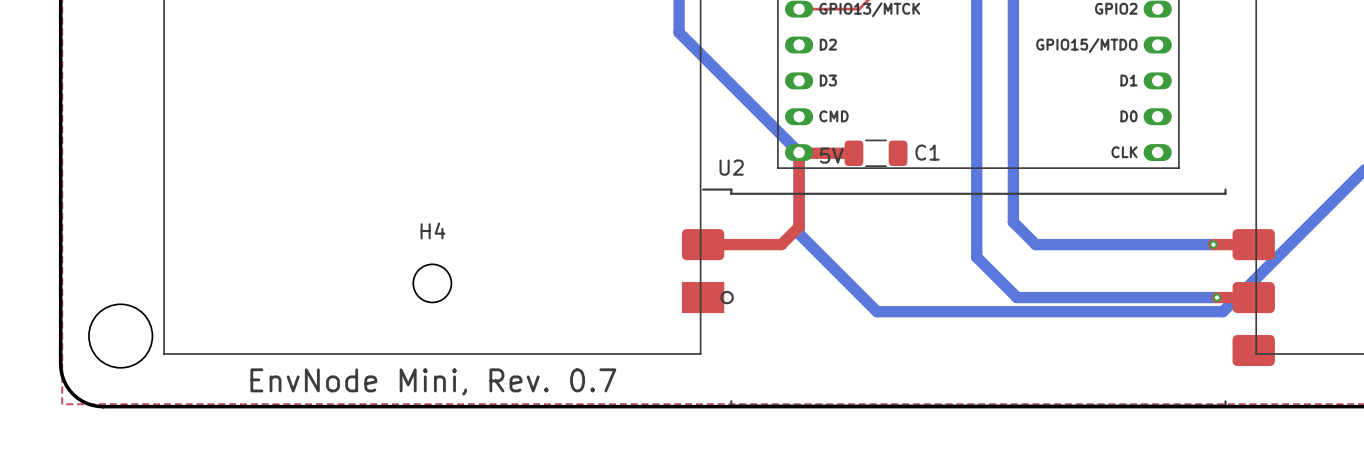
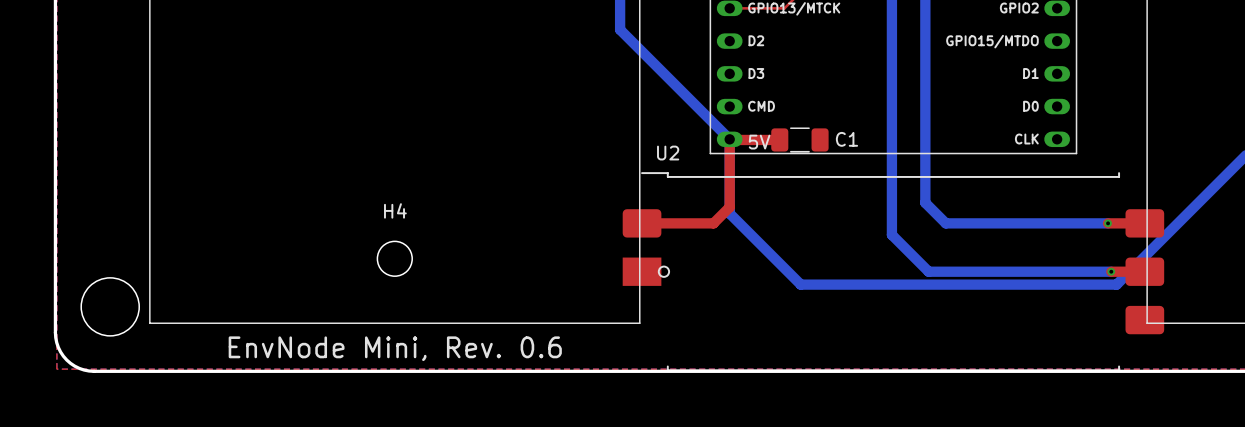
text: EnvNode Mini, Rev. 0.7 (433, 381) -> EnvNode Mini, Rev. 0.6 (395, 348)

